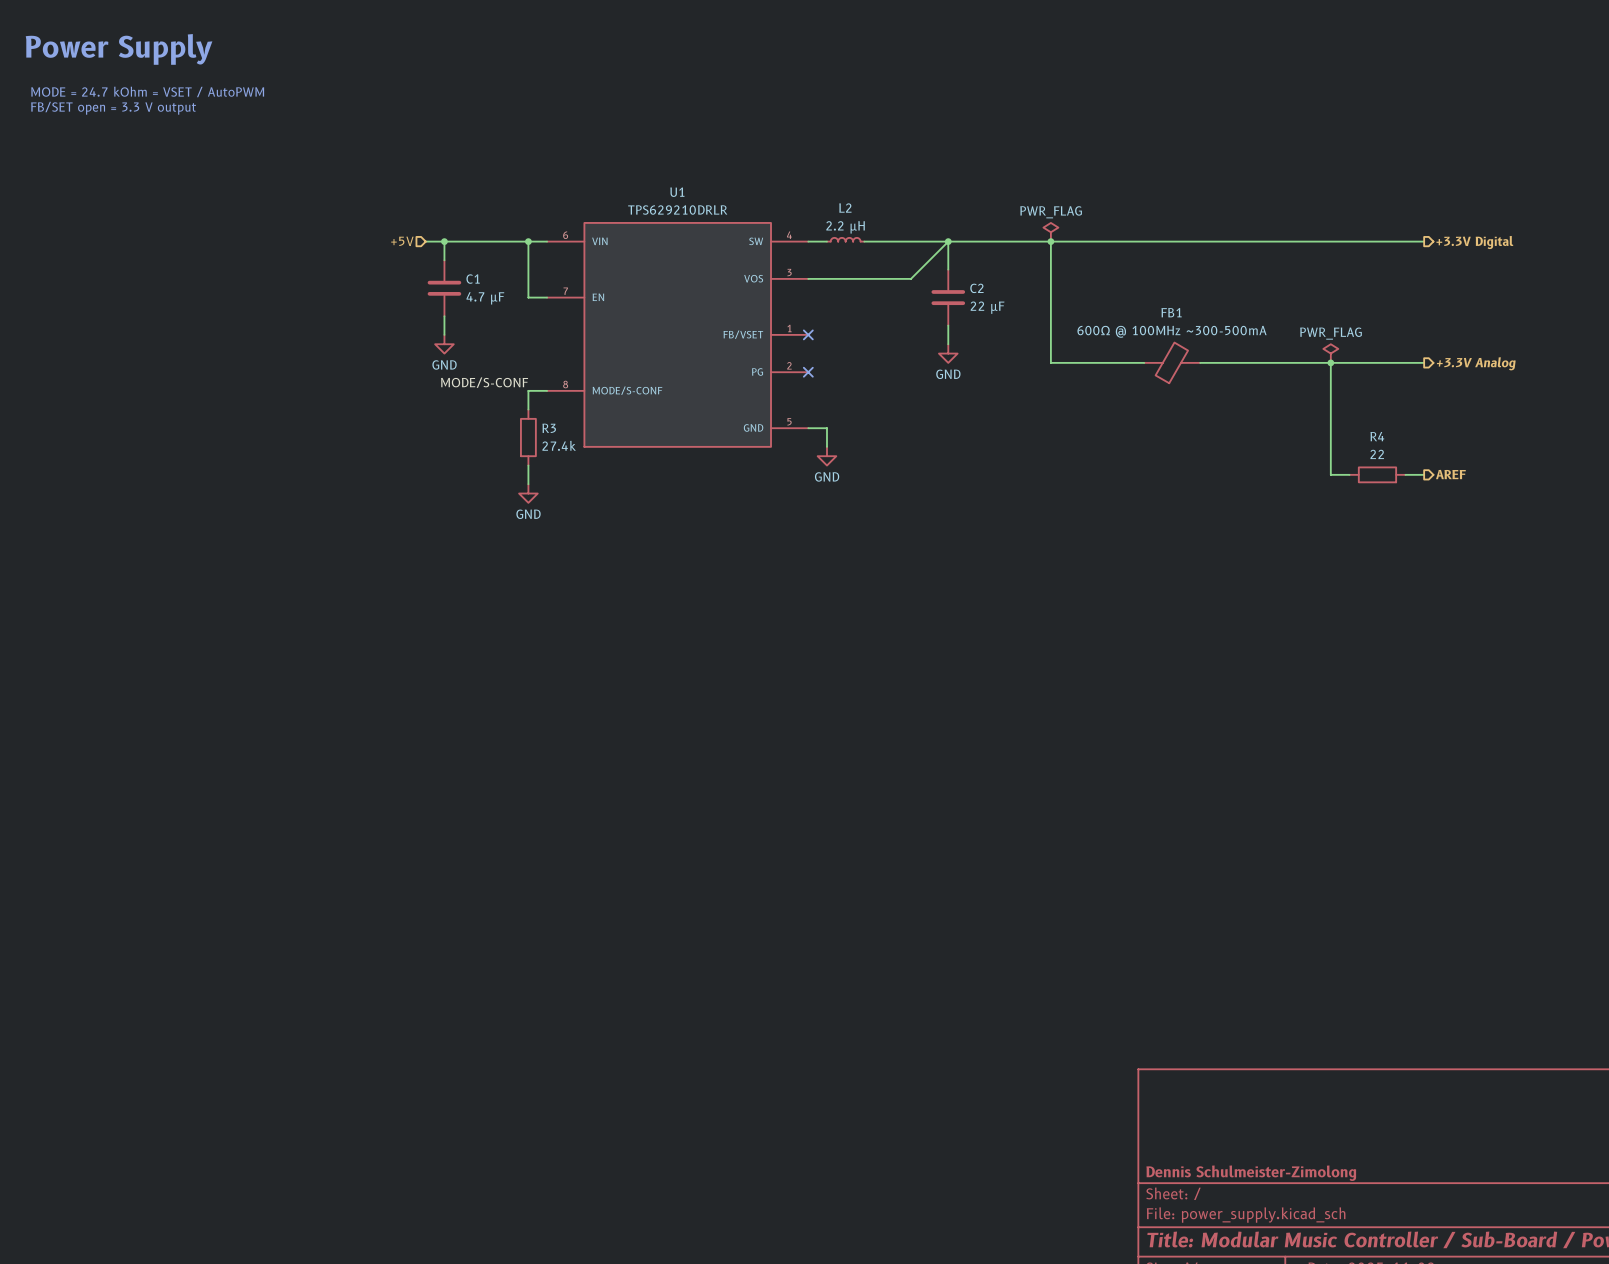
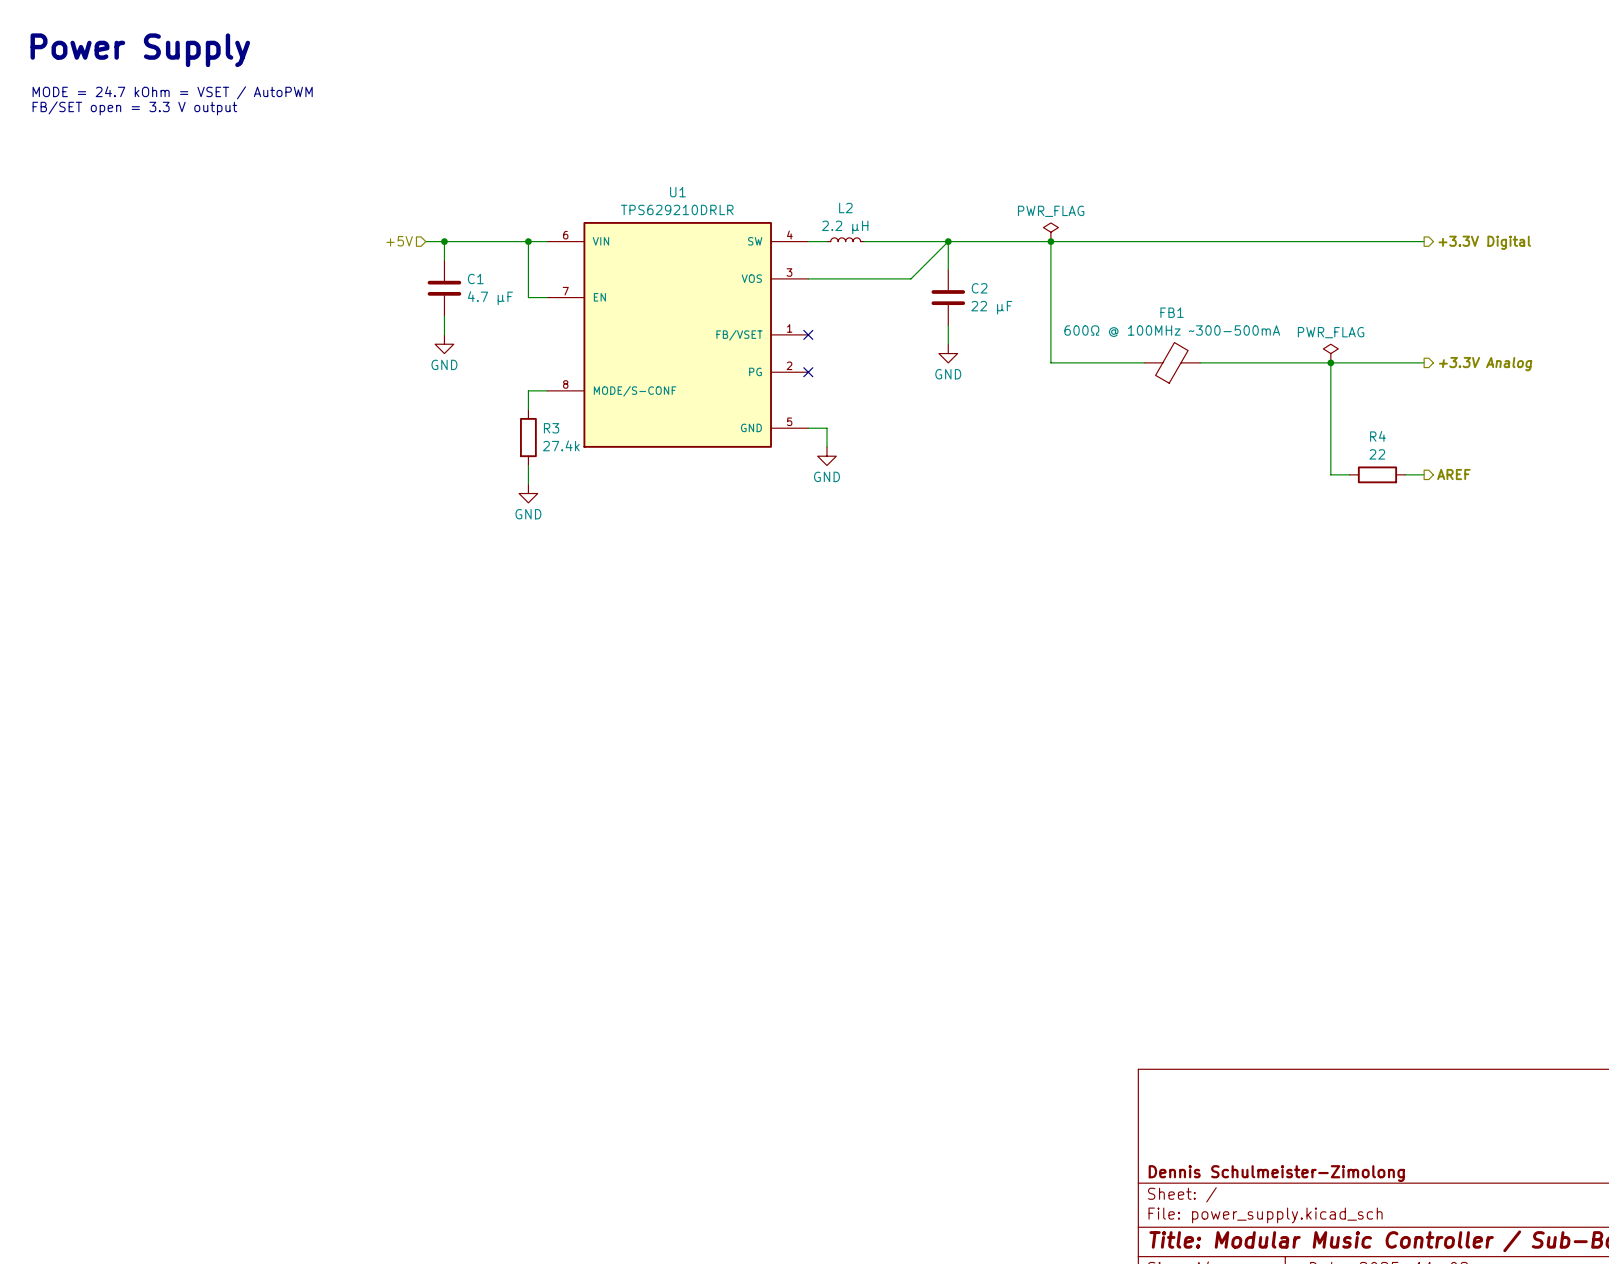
label: MODE/S-CONF (484, 382) -> none

